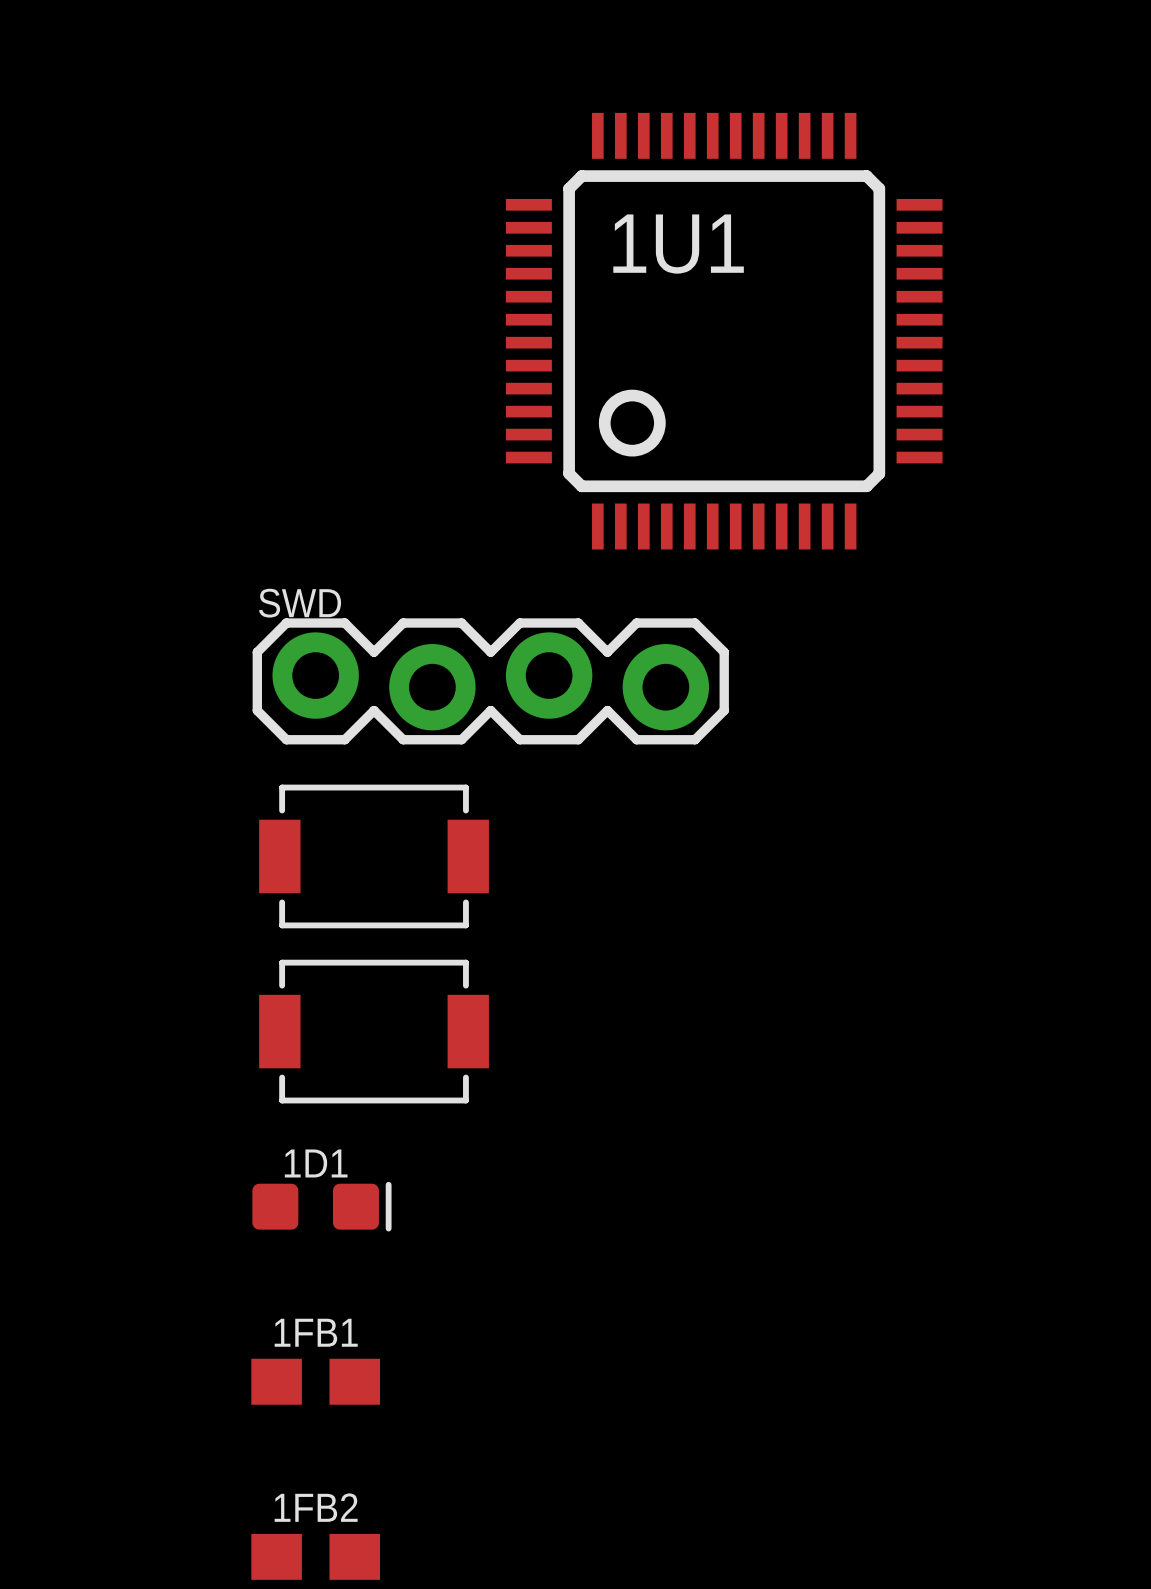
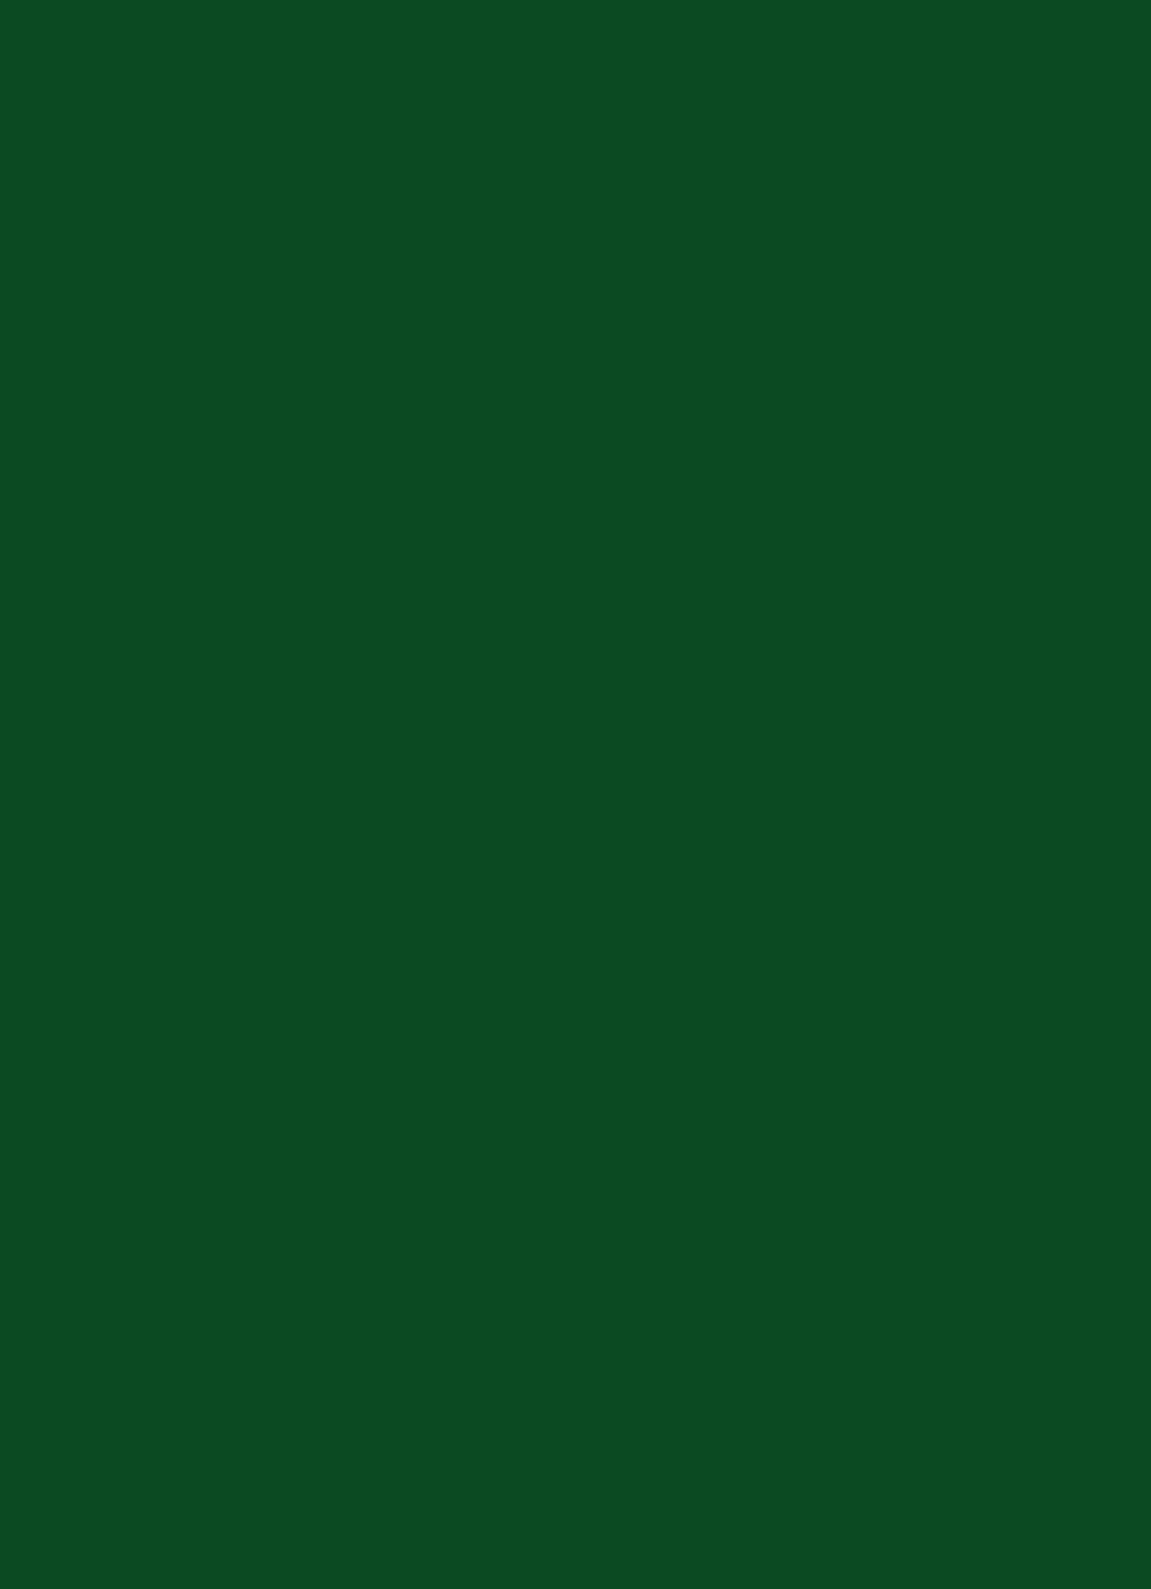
1U1: (724, 331) -> none
SWD: (490, 681) -> none
part: (374, 856) -> none
part: (374, 1031) -> none
1D1: (321, 1206) -> none
1FB1: (315, 1381) -> none
1FB2: (315, 1556) -> none

